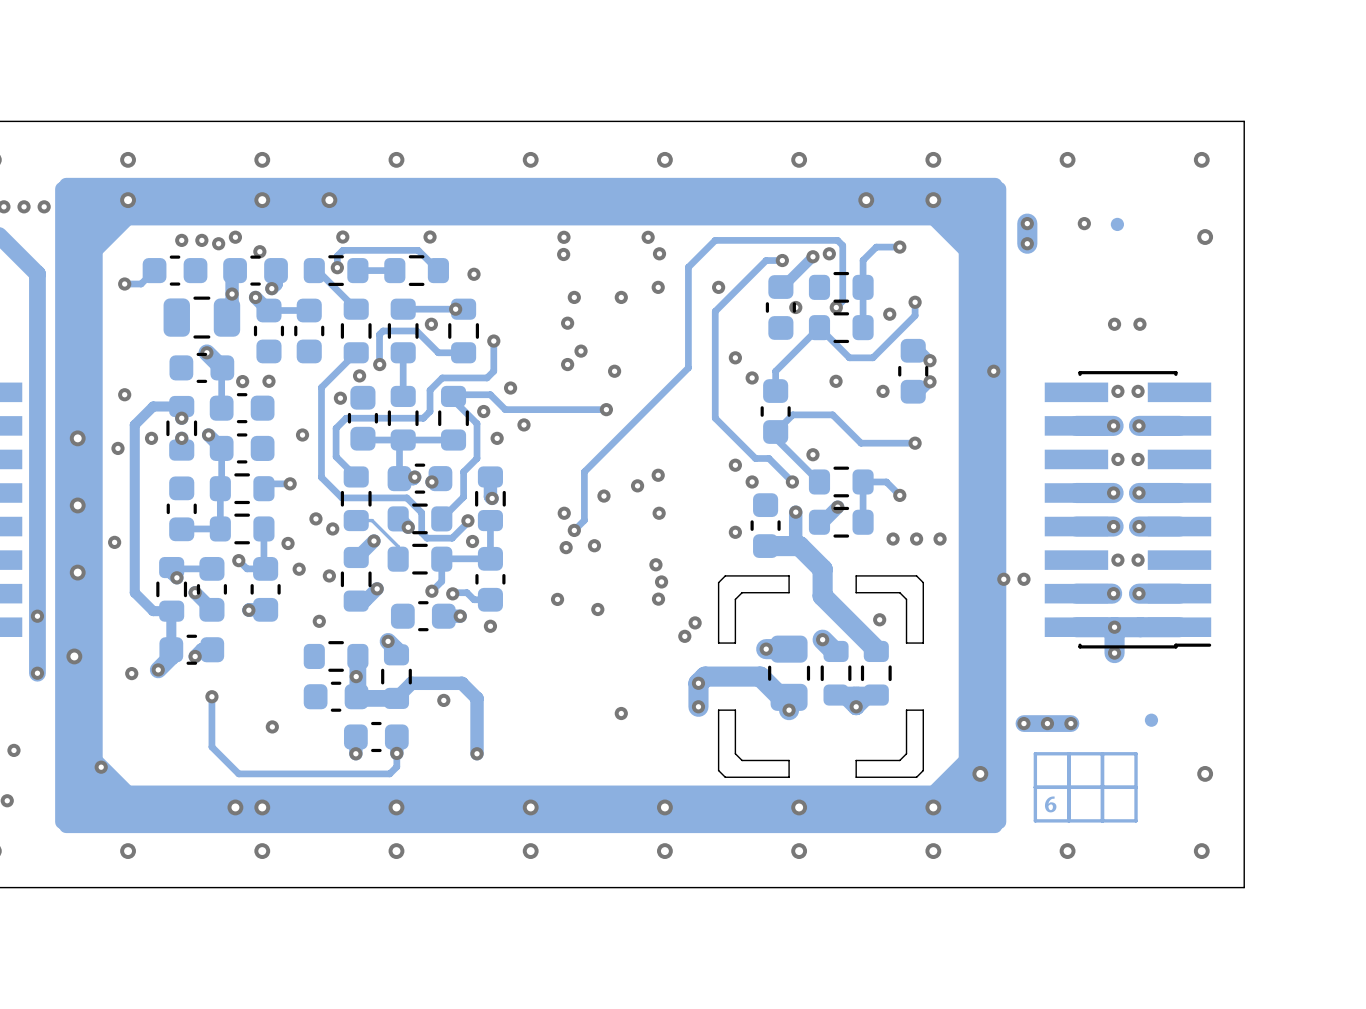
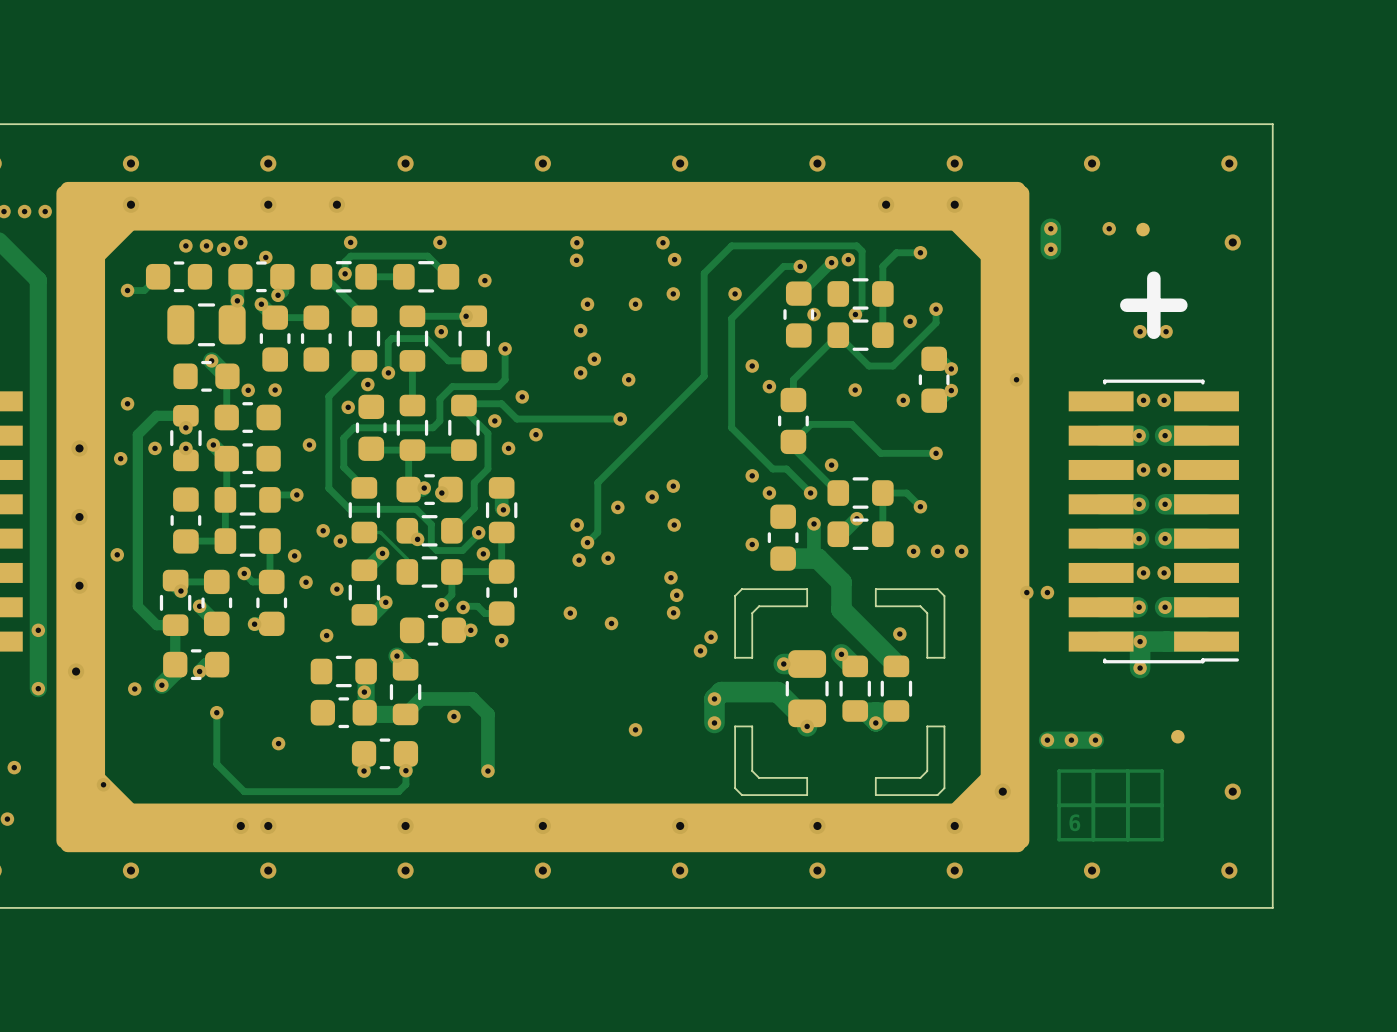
line: none -> (1153, 278) (1153, 332)
line: none -> (1180, 305) (1126, 305)

